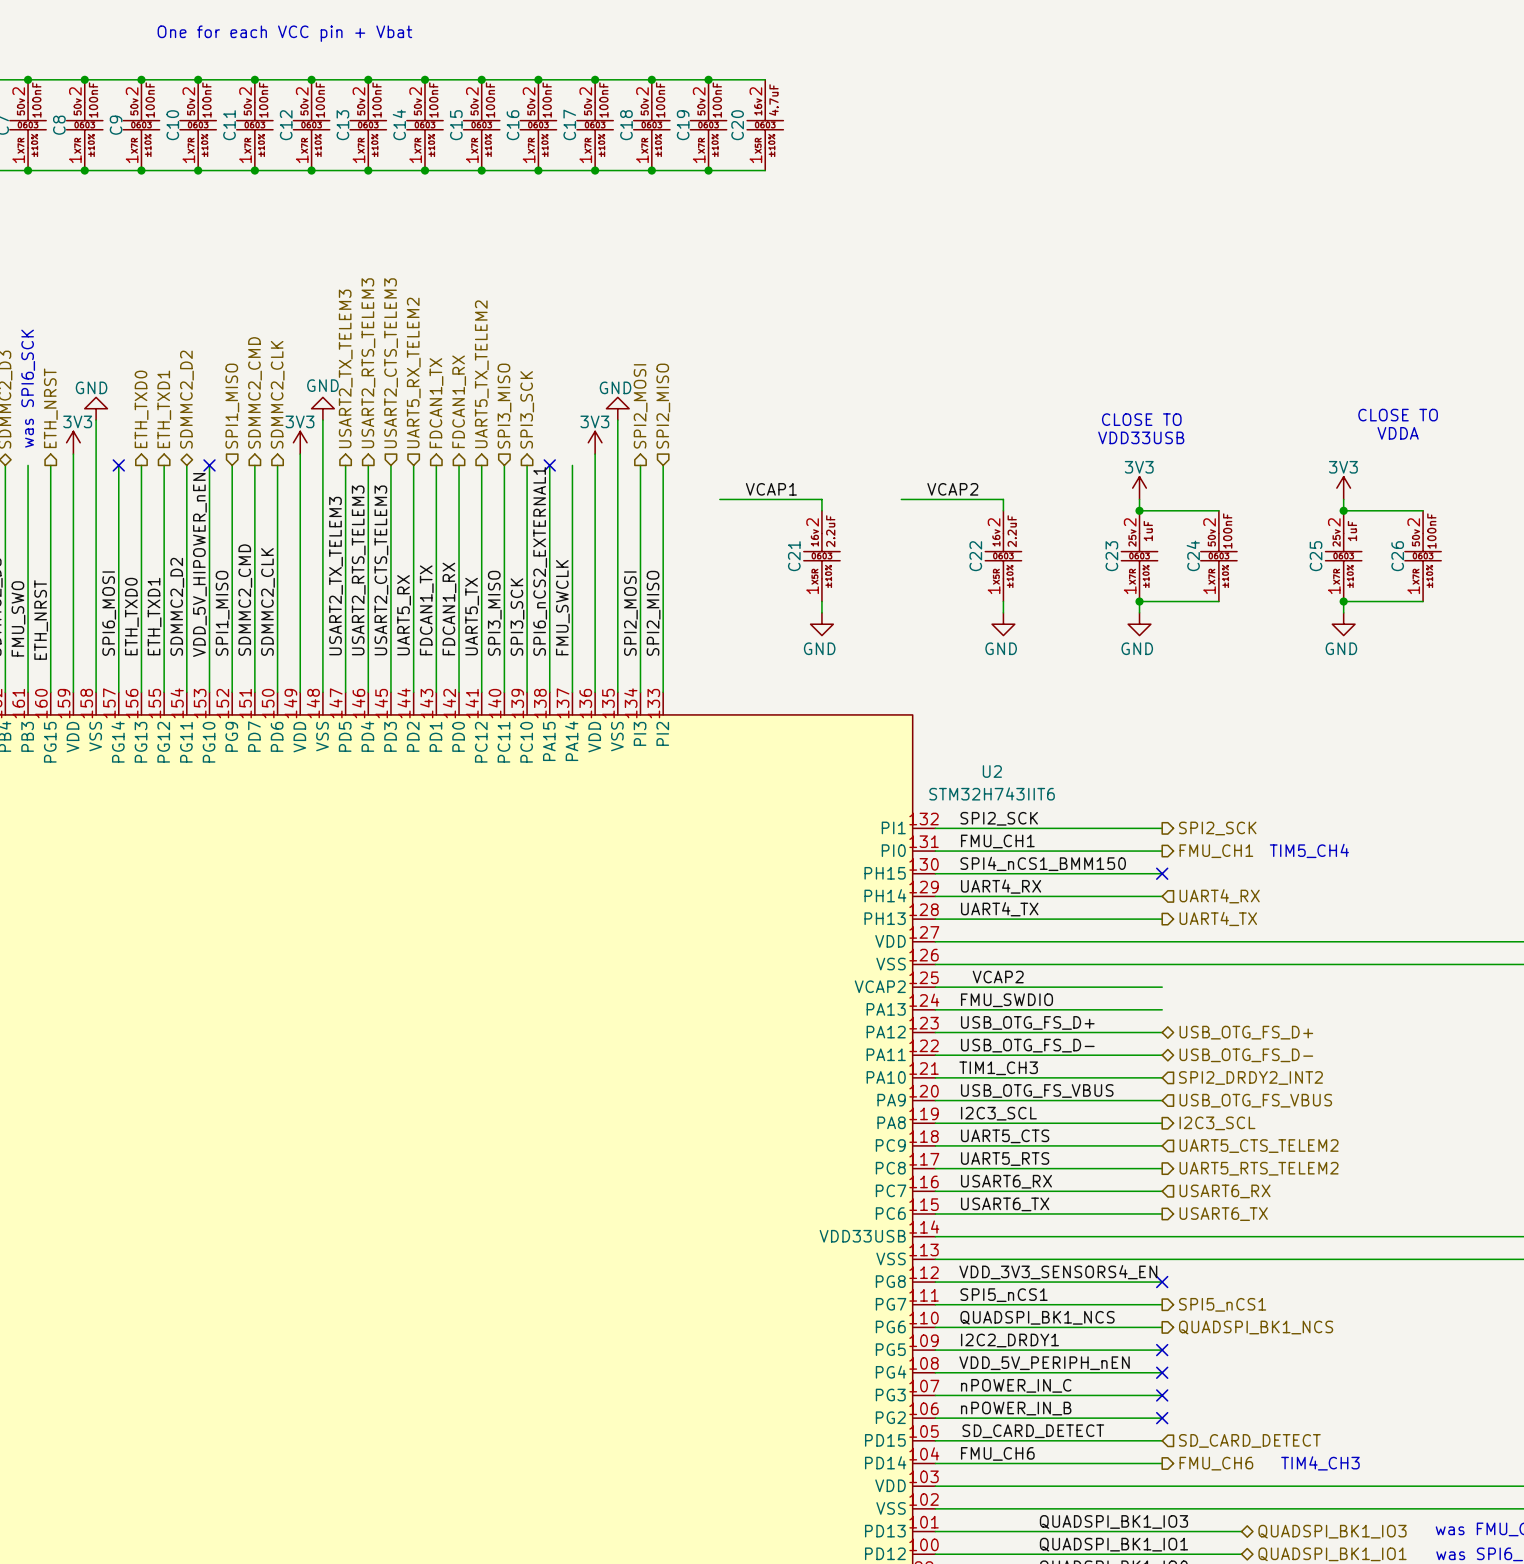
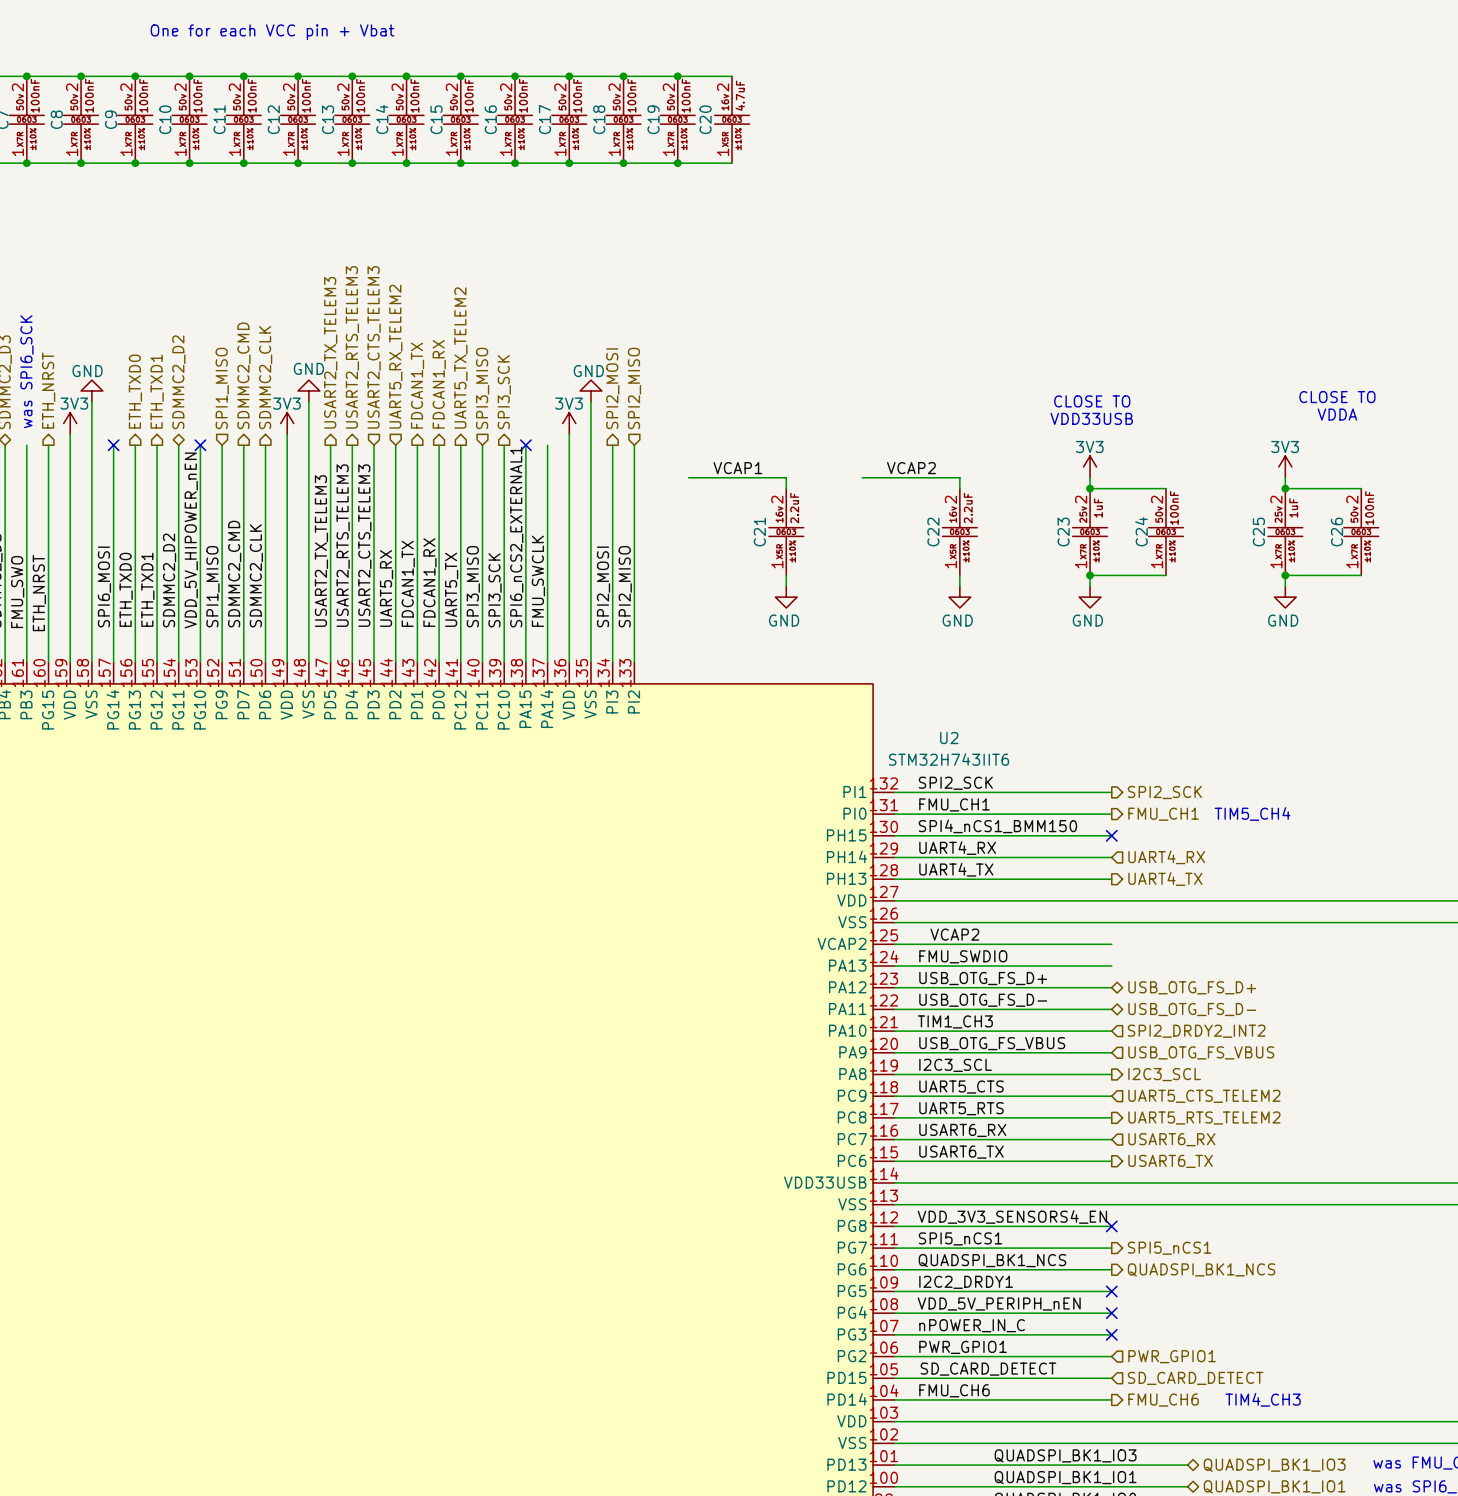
label: nPOWER_IN_B (1016, 1408) -> PWR_GPIO1 (963, 1347)
no-connect mark: (1162, 1418) -> none
hierarchical label: none -> PWR_GPIO1 (1172, 1356)

